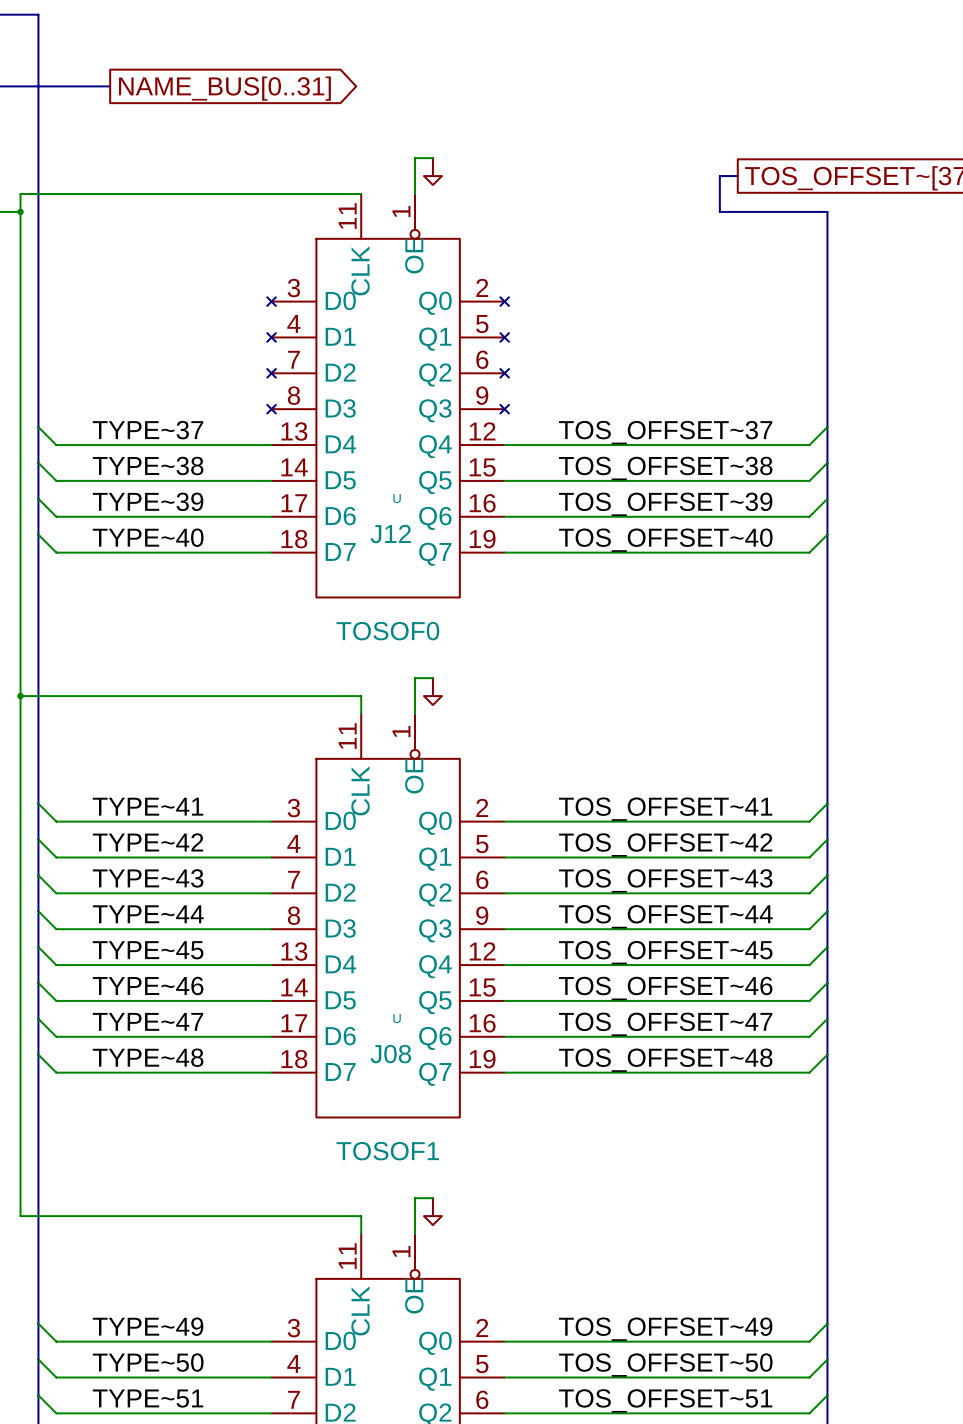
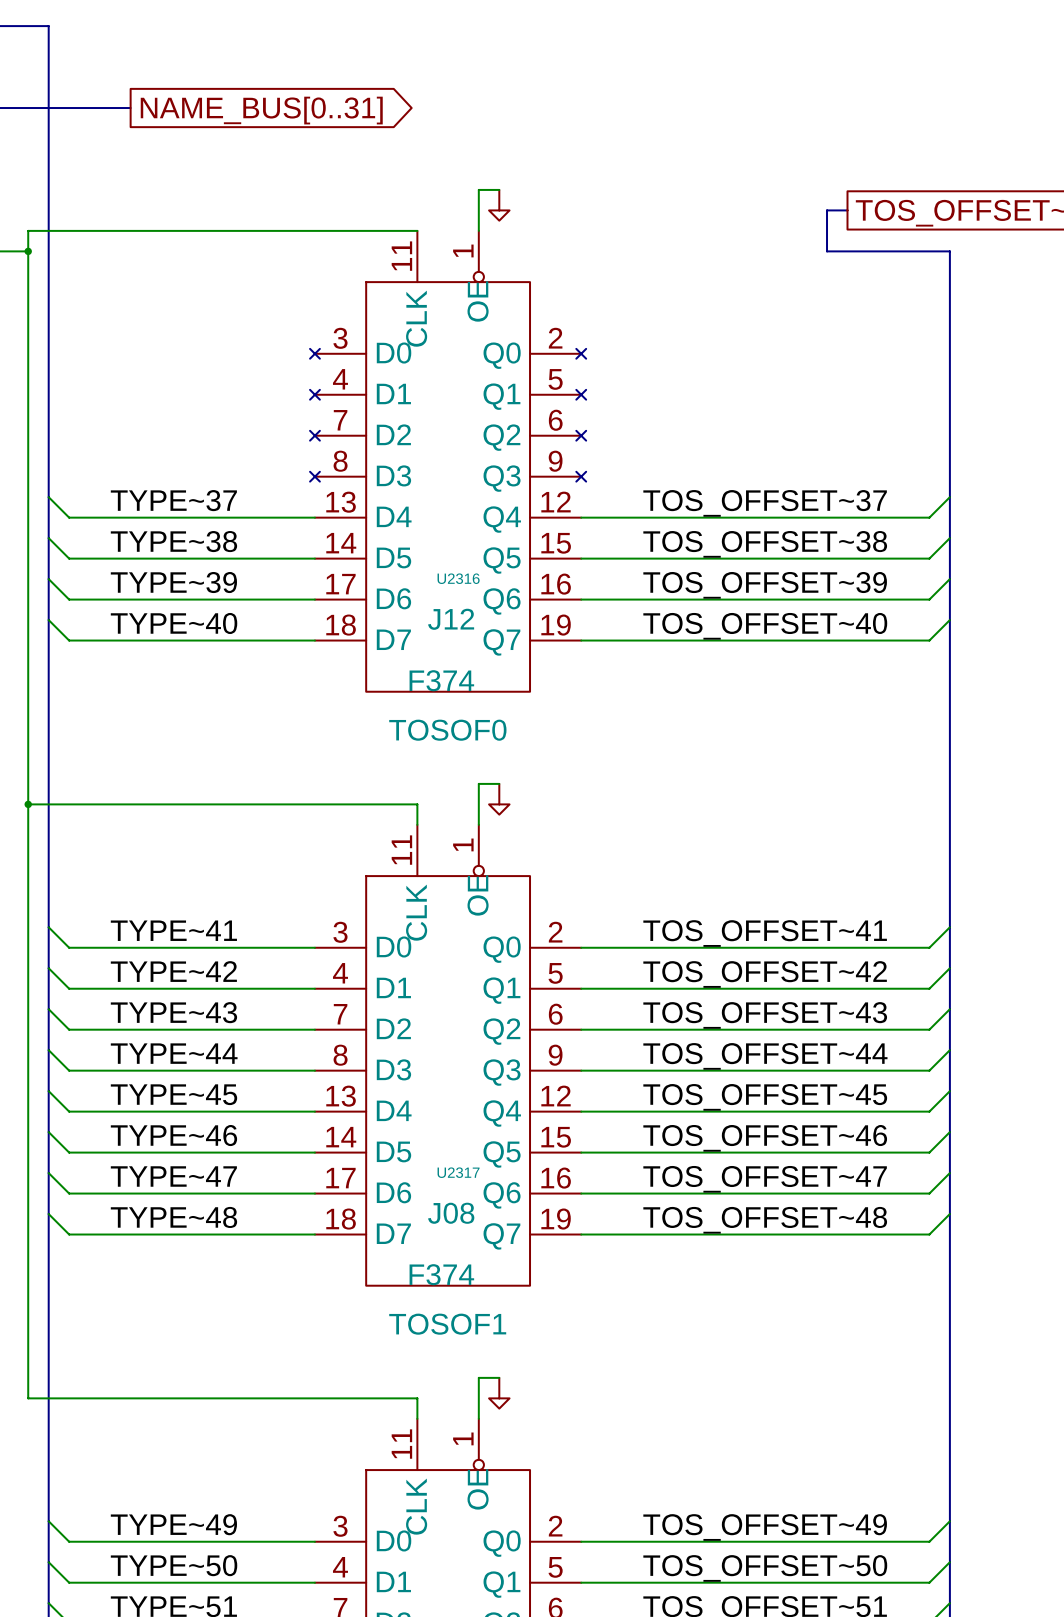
U name: U (397, 498) -> U2316 (458, 578)
U value: none -> F374 (441, 680)
U name: U (397, 1018) -> U2317 (458, 1172)
U value: none -> F374 (441, 1274)

